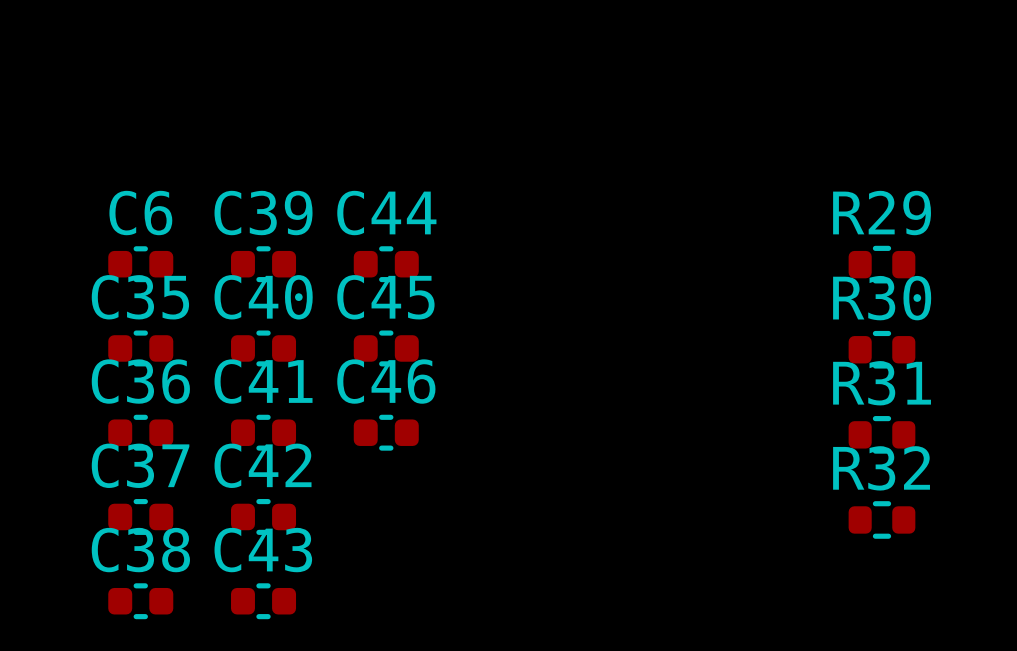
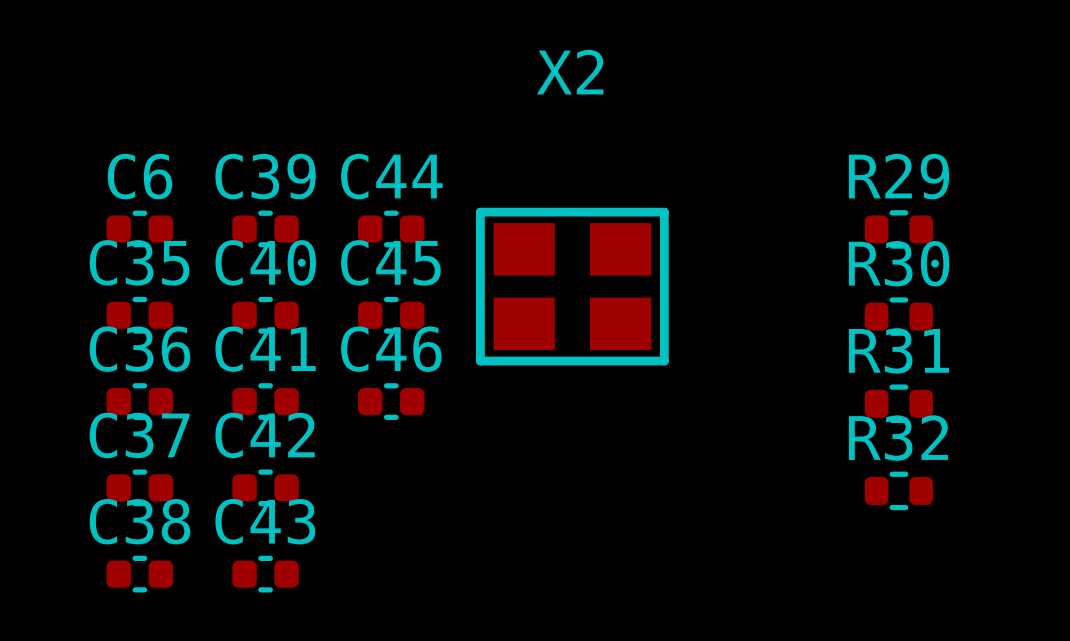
X2: none -> (572, 295)

